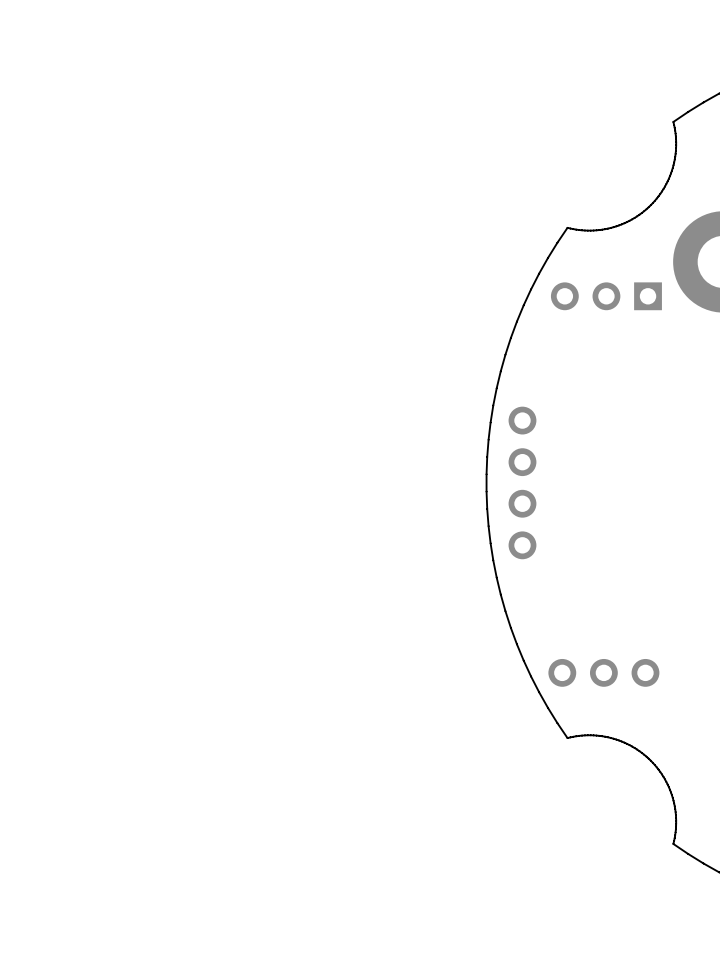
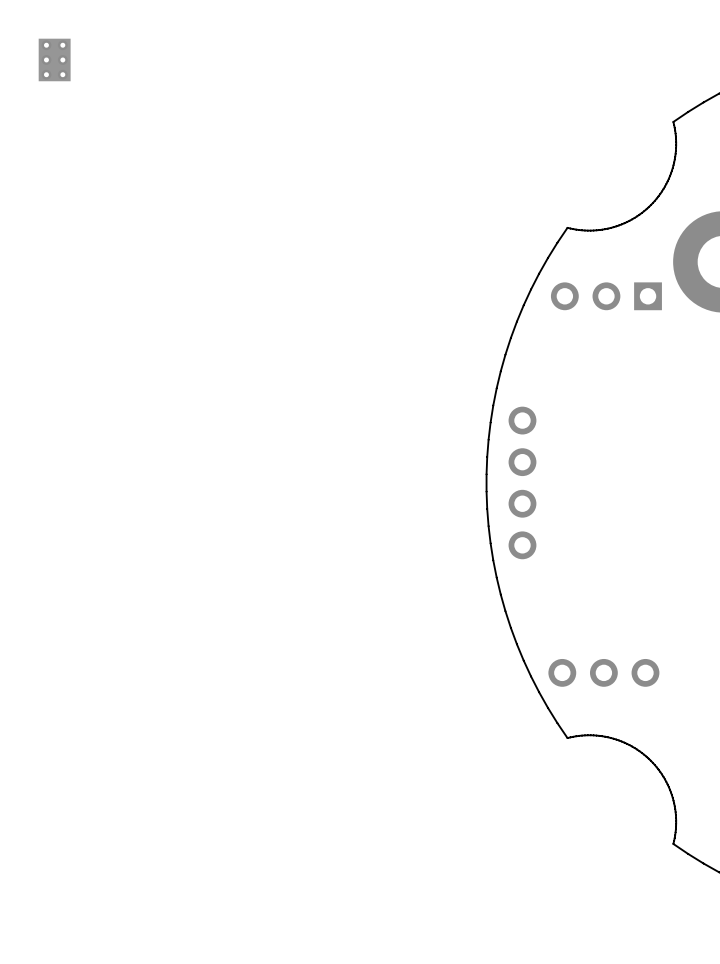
part: none -> (54, 59)

